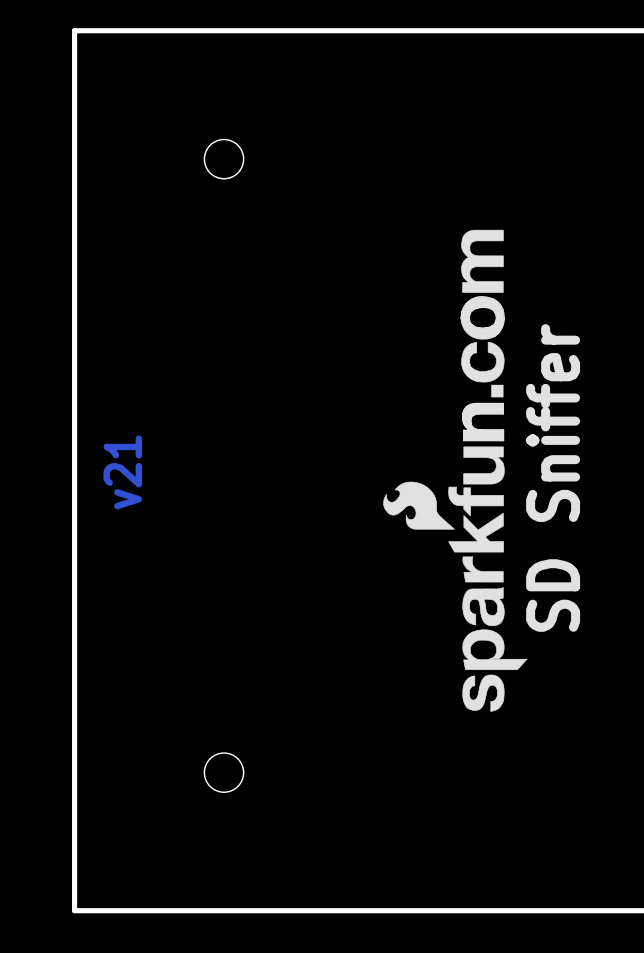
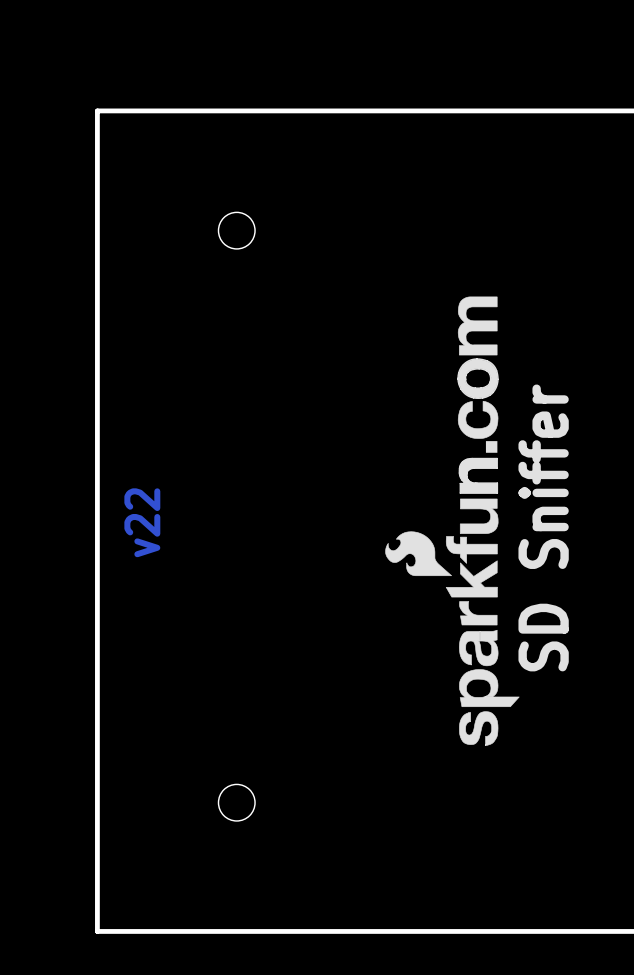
text: v21 (122, 472) -> v22 (142, 522)

